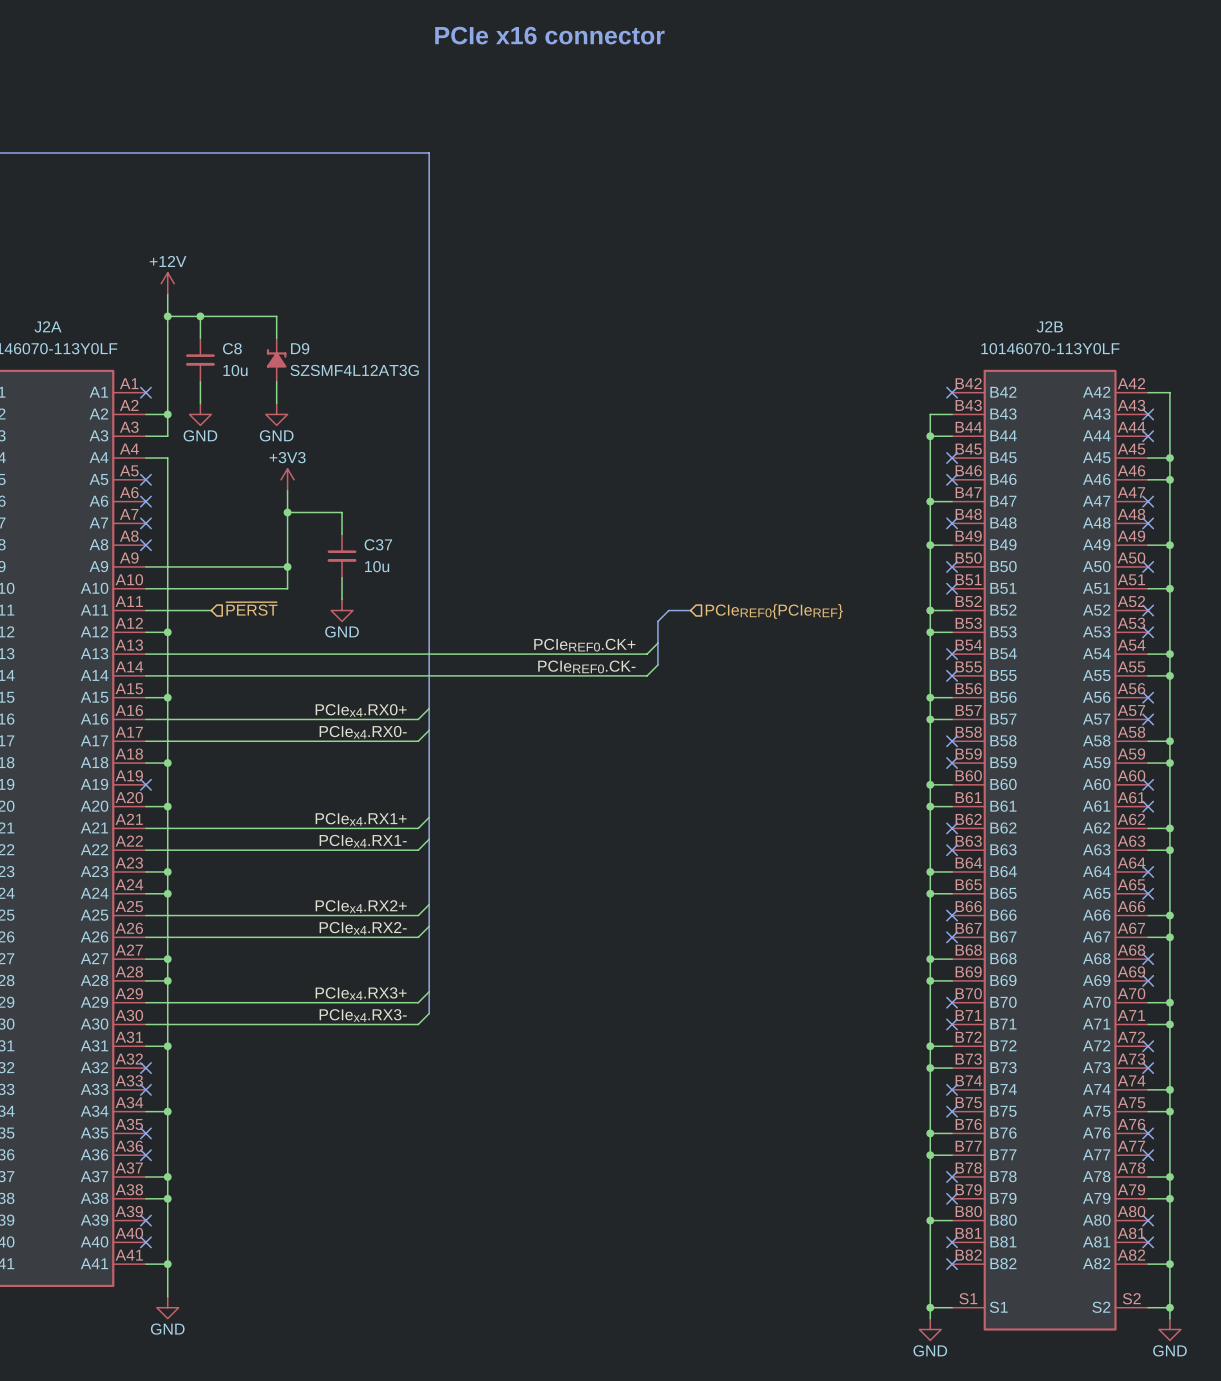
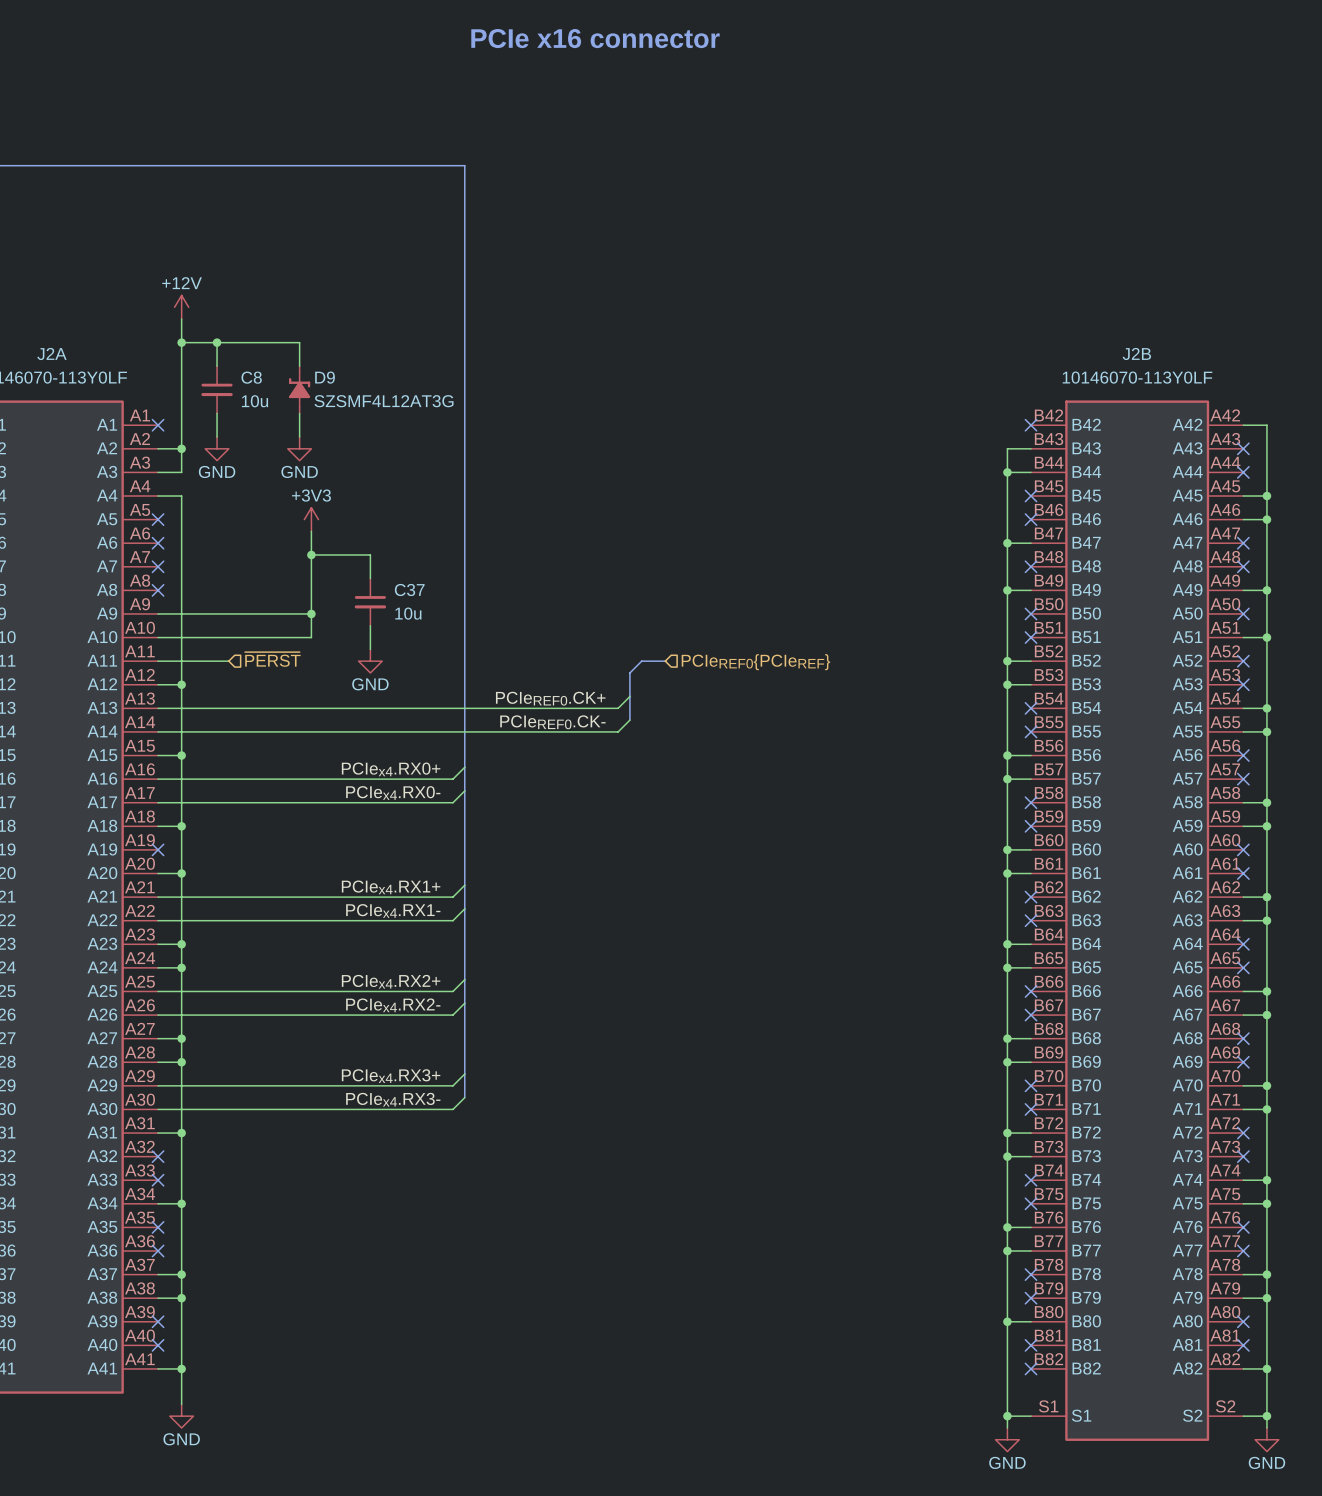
bus: (690, 610) (668, 610) (657, 621) (657, 665) -> (665, 661) (641, 661) (629, 672) (629, 720)
hierarchical label position: PCIeREF0{PCIeREF} (774, 611) -> PCIeREF0{PCIeREF} (755, 662)
wire: (657, 643) (647, 654) (570, 654) -> (629, 696) (618, 708)
label position: PCIeREF0.CK+ (584, 645) -> PCIeREF0.CK+ (550, 698)
wire: (657, 665) (647, 675) (570, 675) -> (629, 720) (618, 731)
label position: PCIeREF0.CK- (586, 666) -> PCIeREF0.CK- (552, 722)

